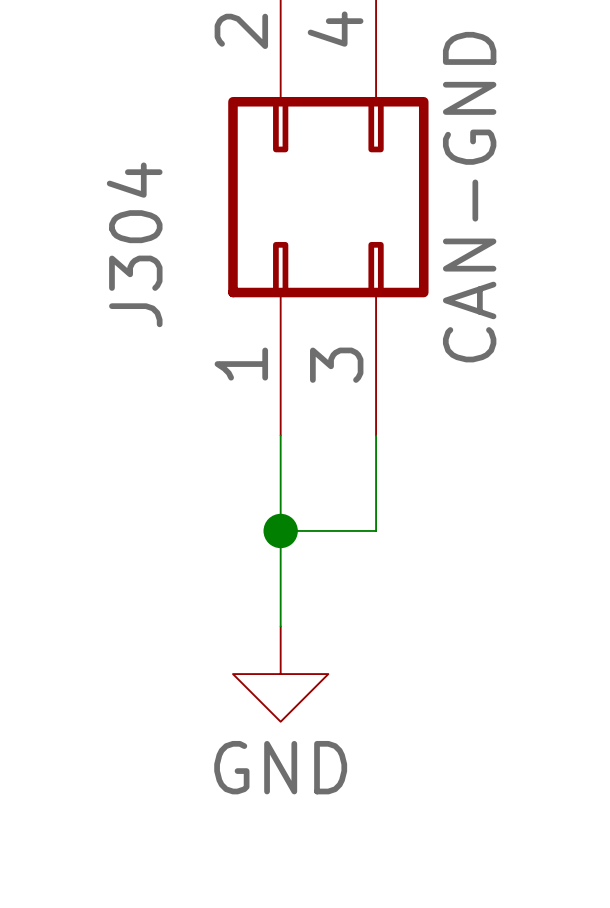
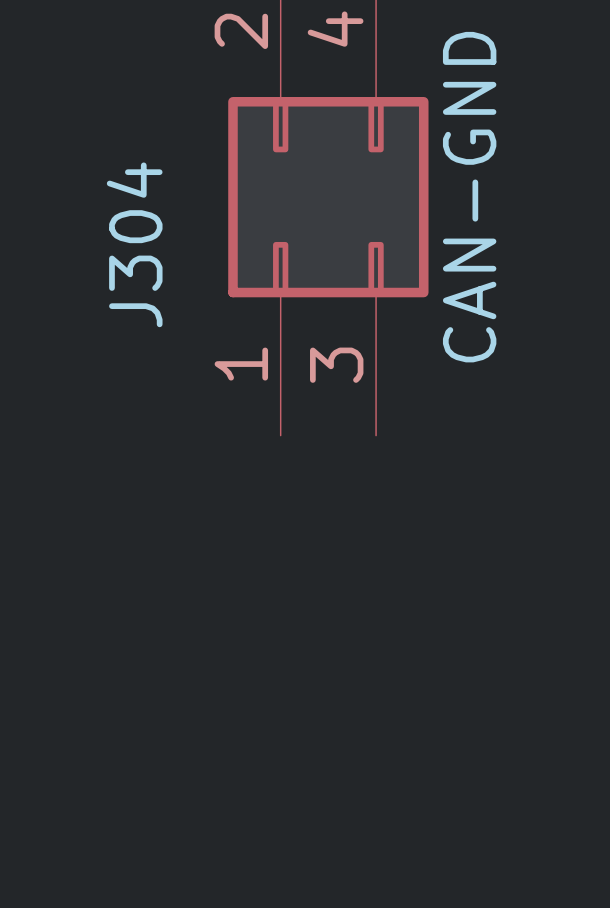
wire: (280, 435) (280, 626) -> none
wire: (376, 435) (376, 530) (280, 530) -> none
junction: (280, 530) -> none
power symbol: GND (280, 674) -> none

